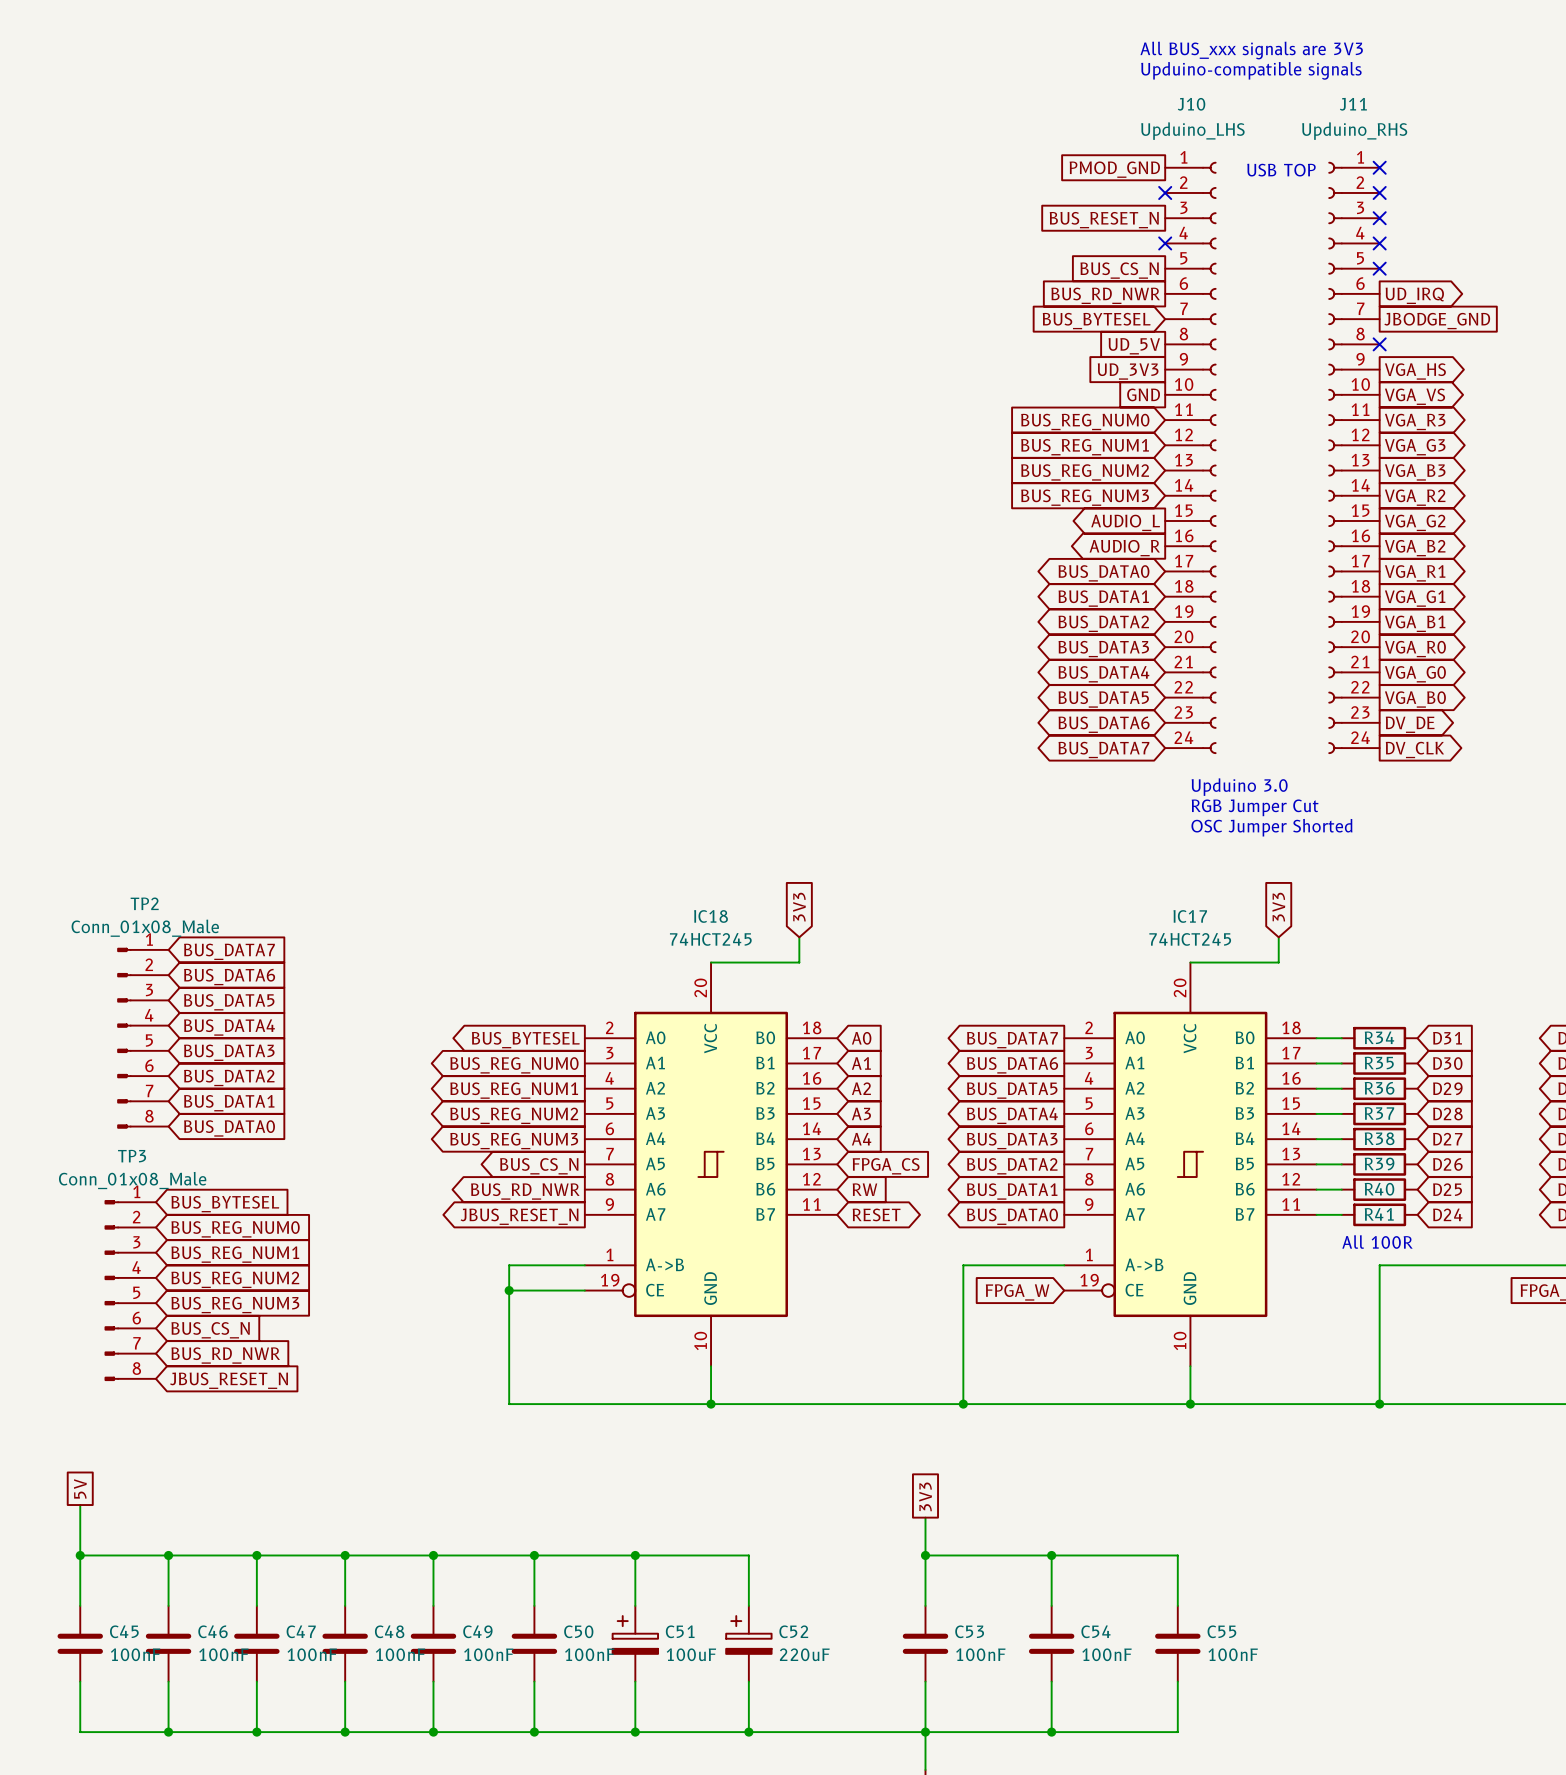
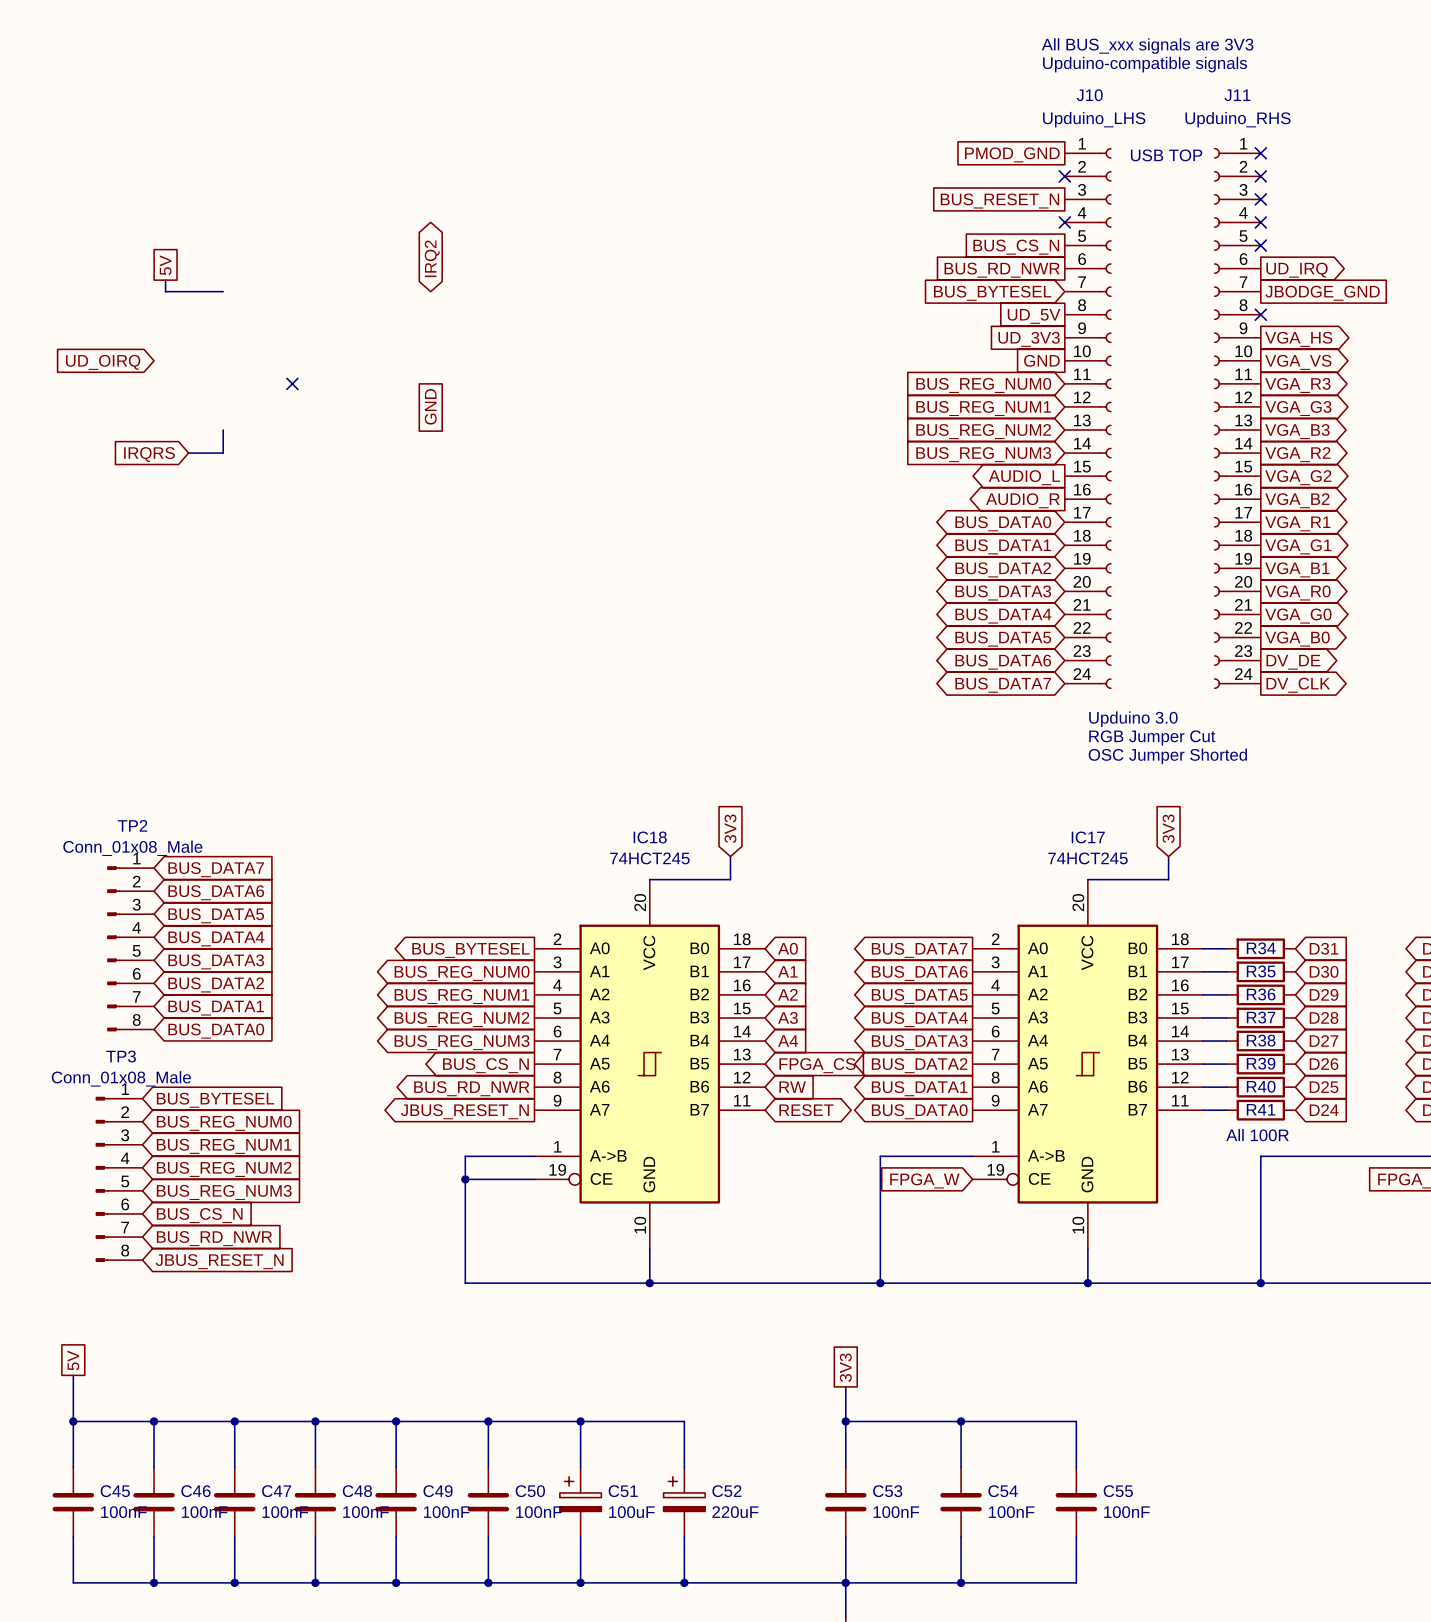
global label: none -> IRQ2 (432, 258)
global label: none -> 5V (165, 265)
wire: none -> (165, 280) (165, 291) (223, 291)
global label: none -> UD_OIRQ (103, 362)
no-connect mark: none -> (292, 383)
global label: none -> GND (430, 406)
wire: none -> (223, 430) (223, 453) (188, 453)
global label: none -> IRQRS (149, 454)

